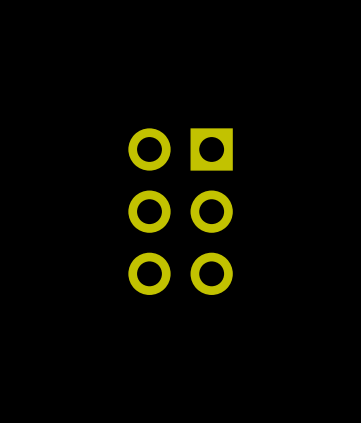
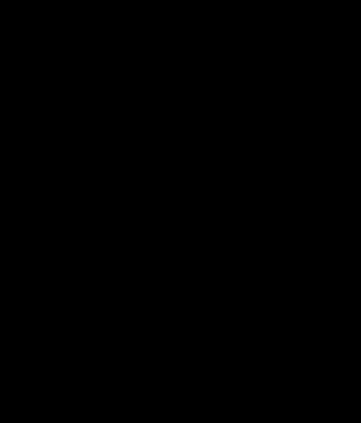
part: (180, 211) -> none

